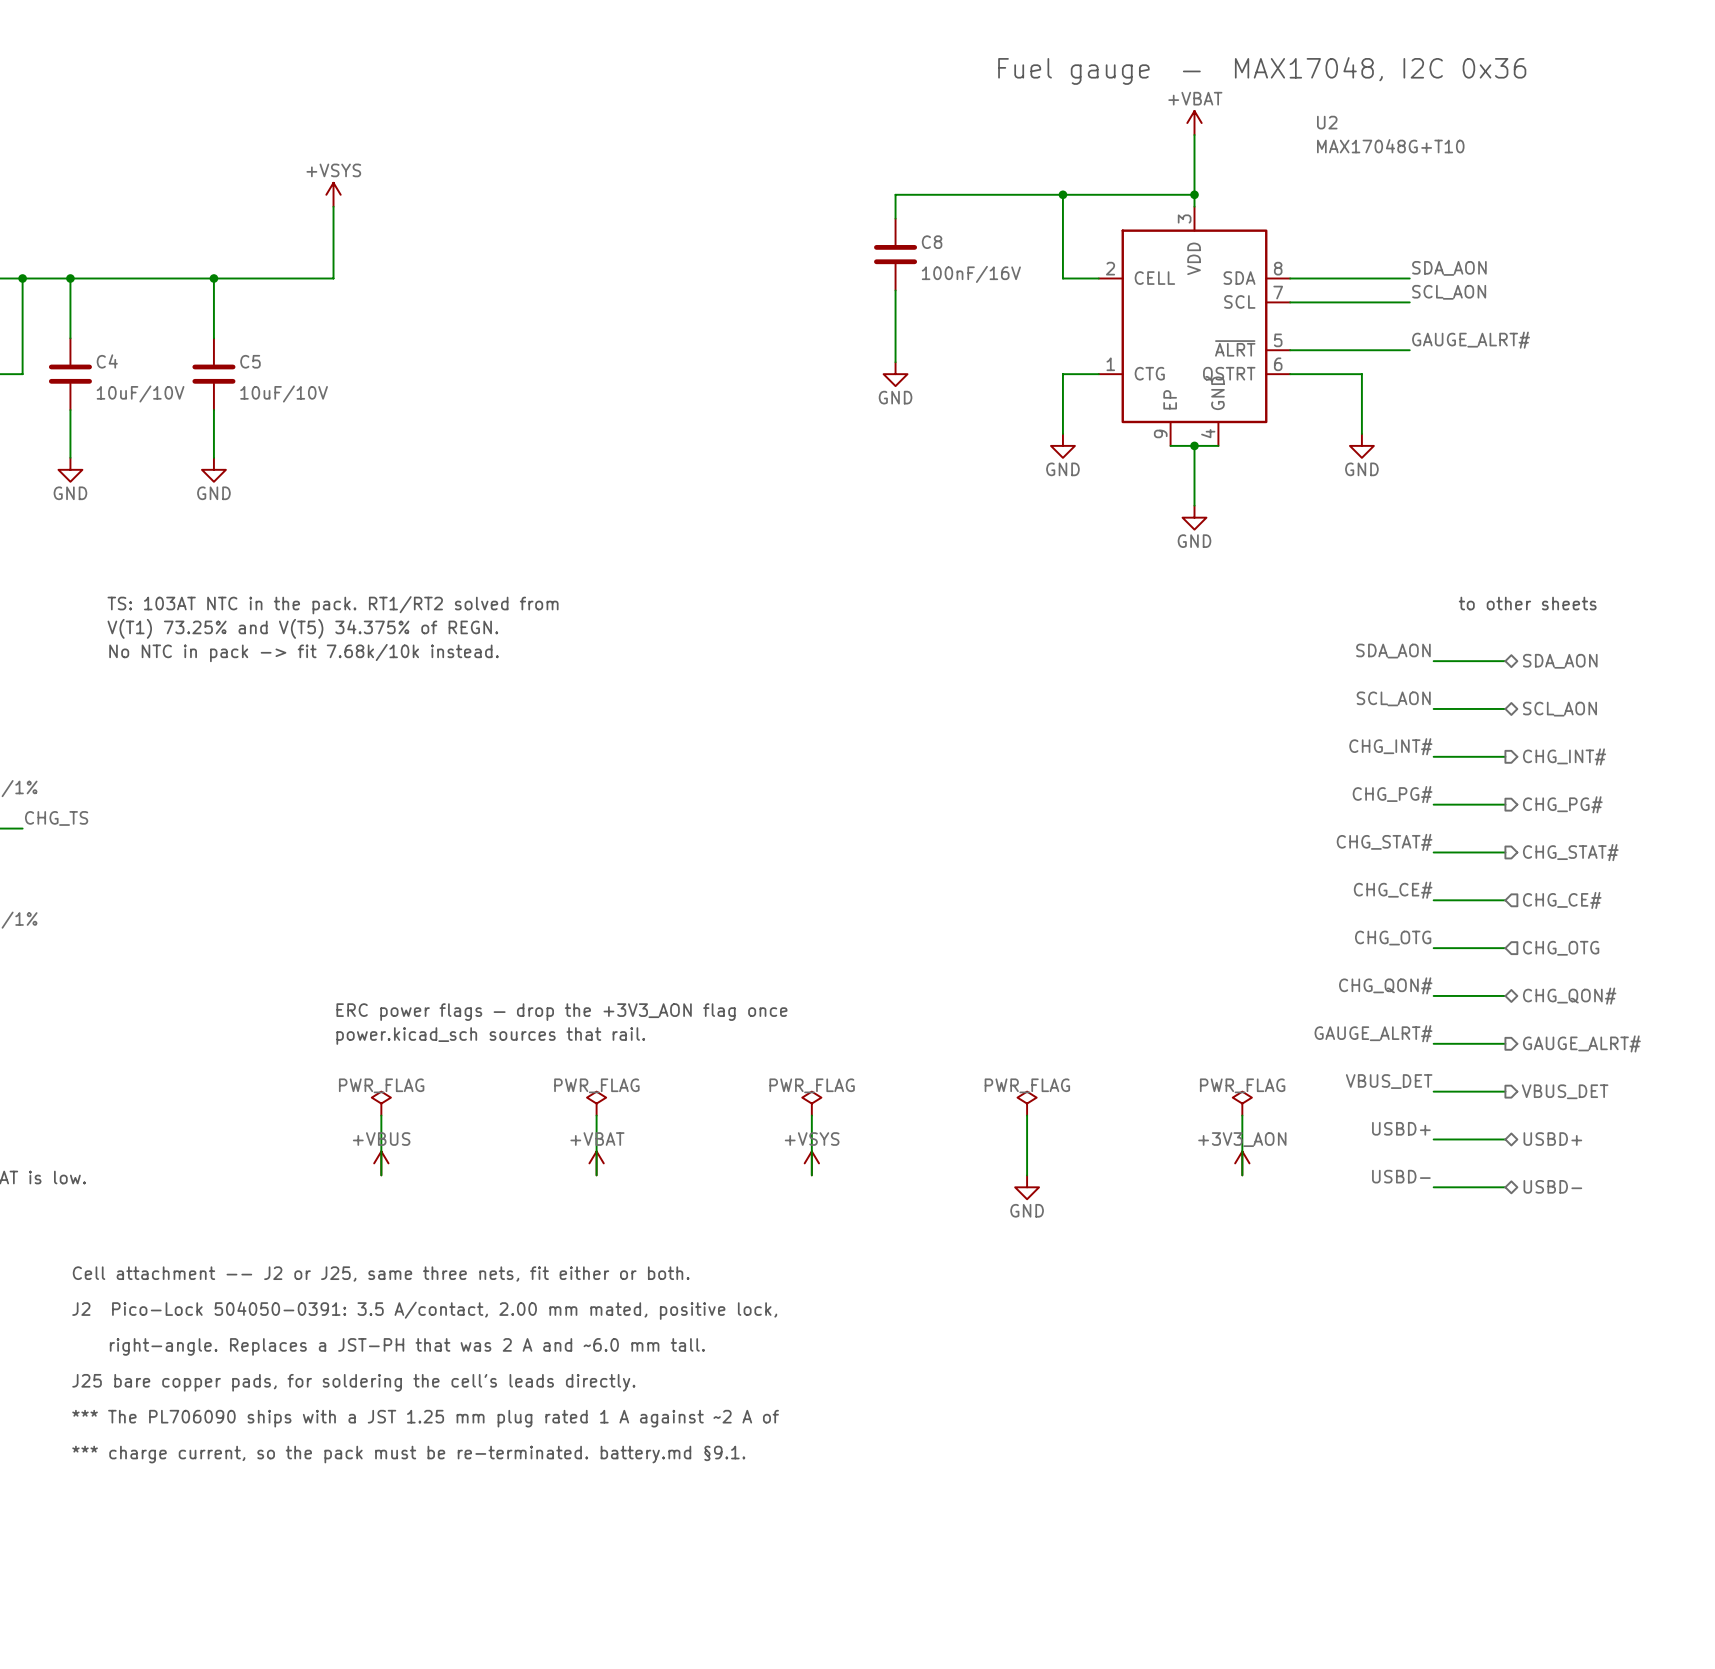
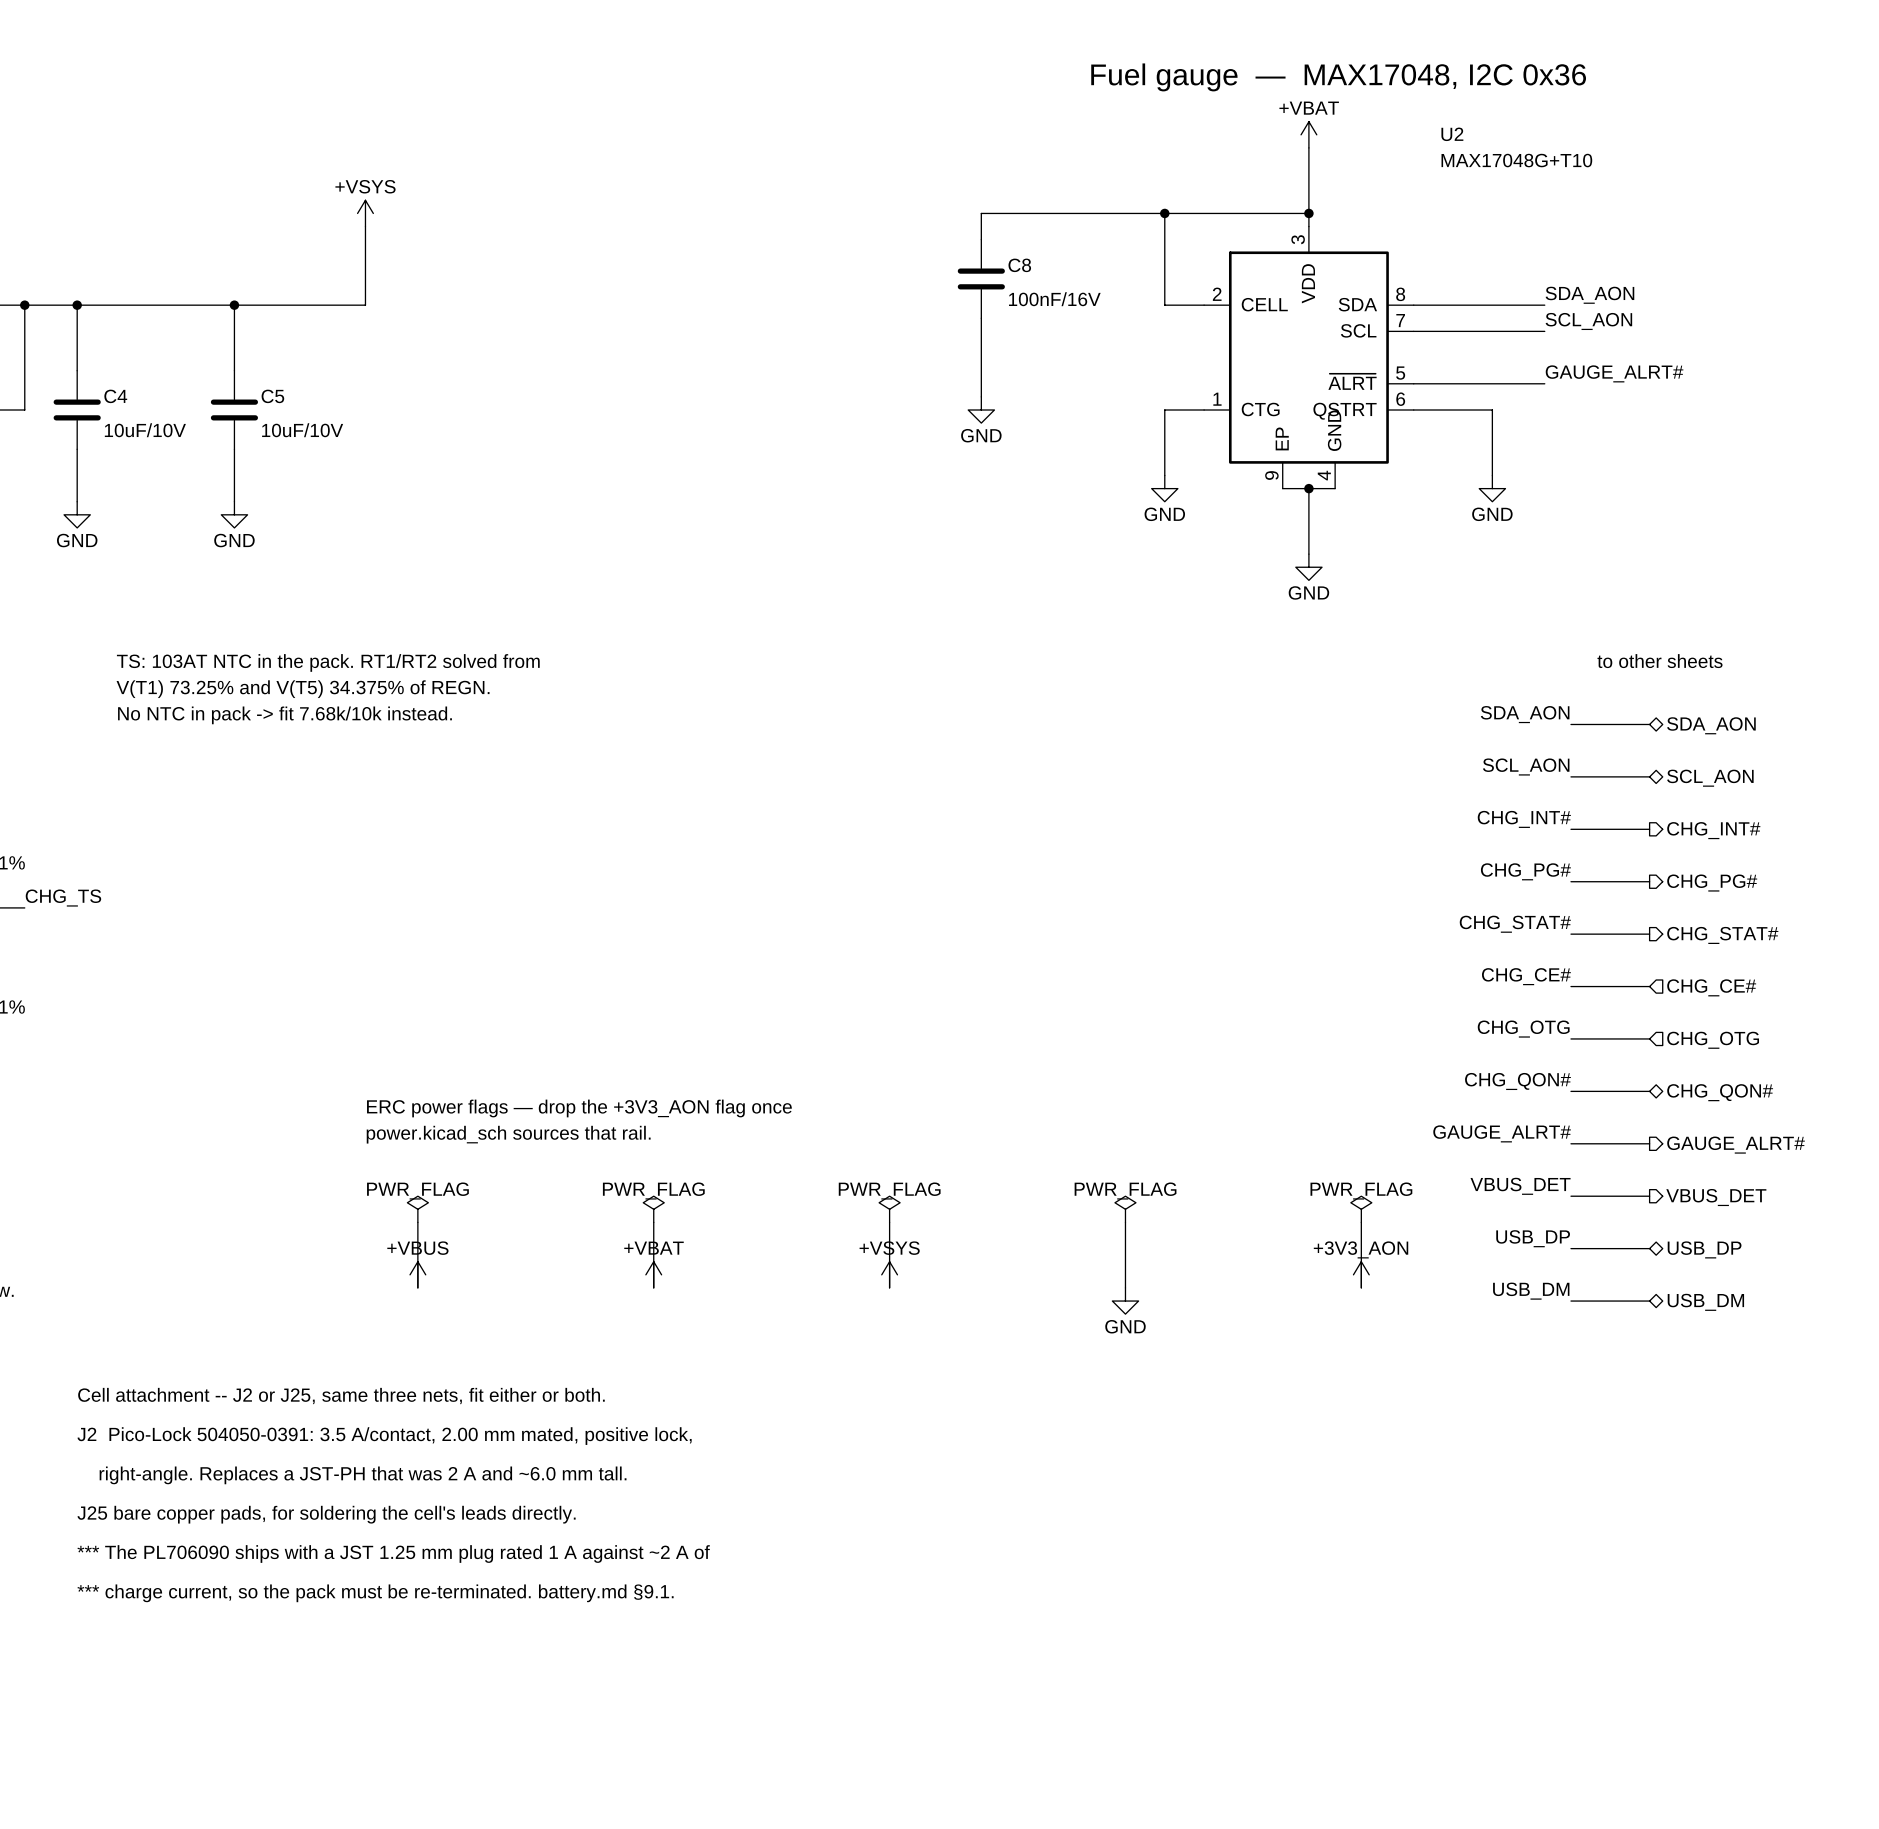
label: USBD+ (1401, 1128) -> USB_DP (1533, 1238)
hierarchical label: USBD+ (1552, 1139) -> USB_DP (1704, 1249)
label: USBD- (1401, 1176) -> USB_DM (1531, 1291)
hierarchical label: USBD- (1552, 1186) -> USB_DM (1705, 1302)

